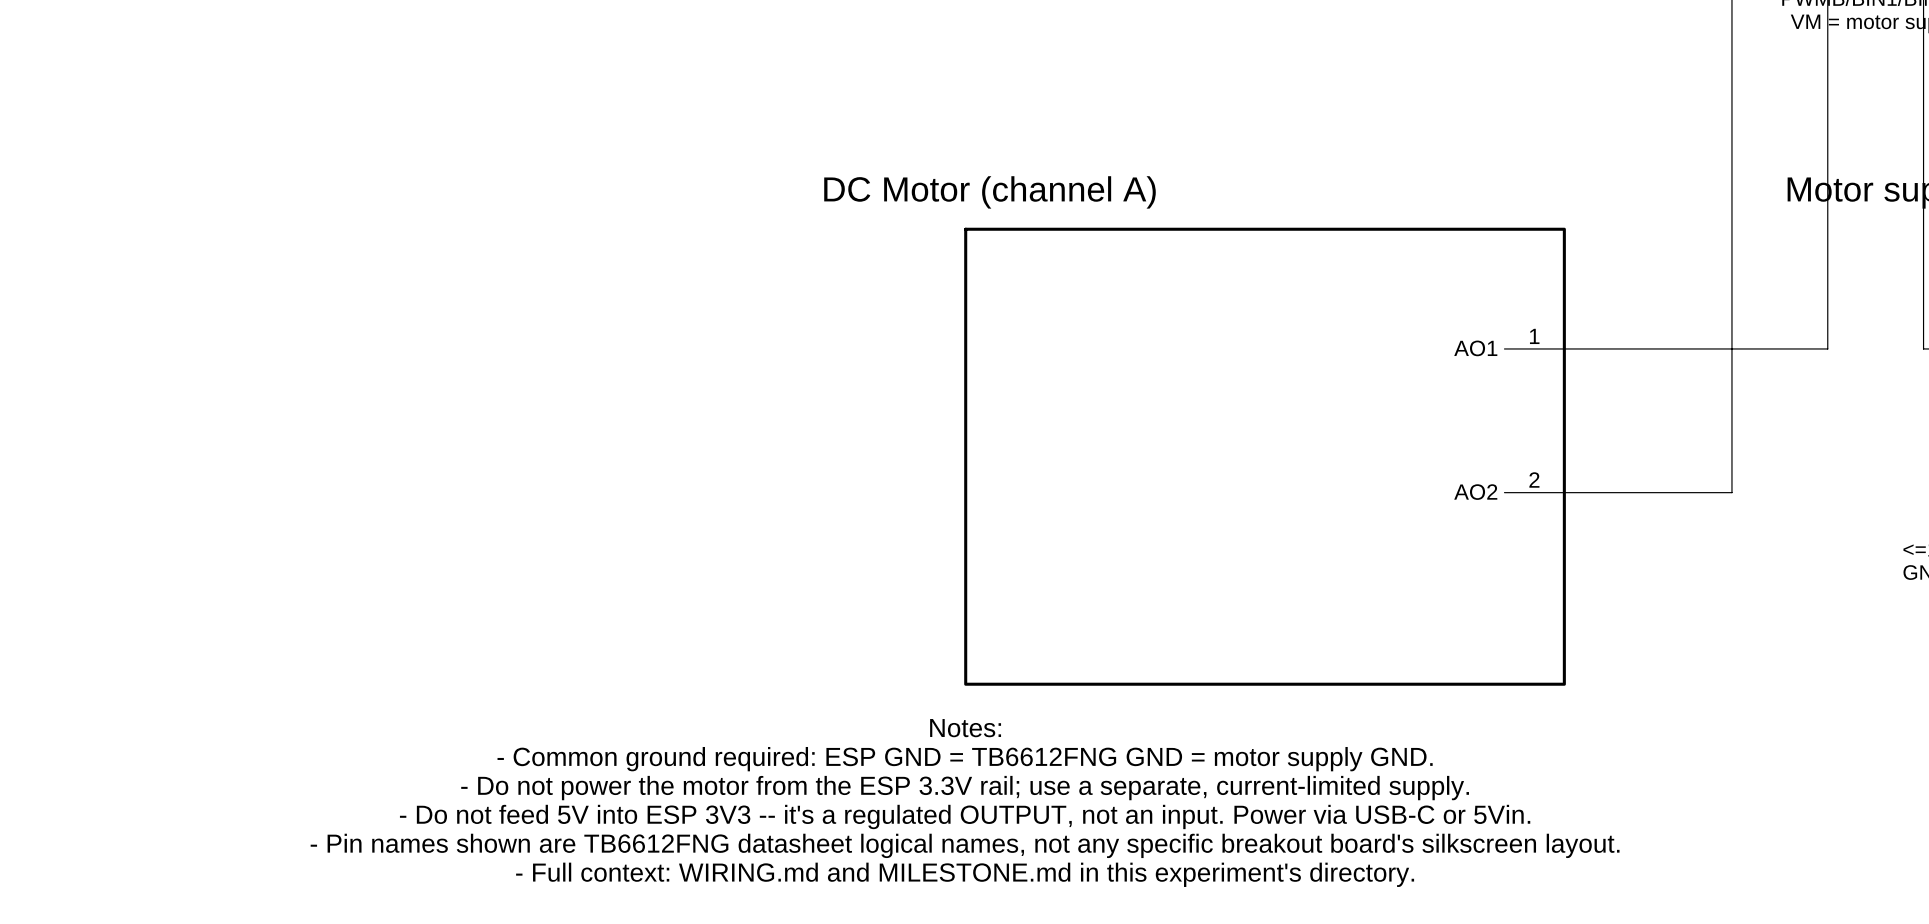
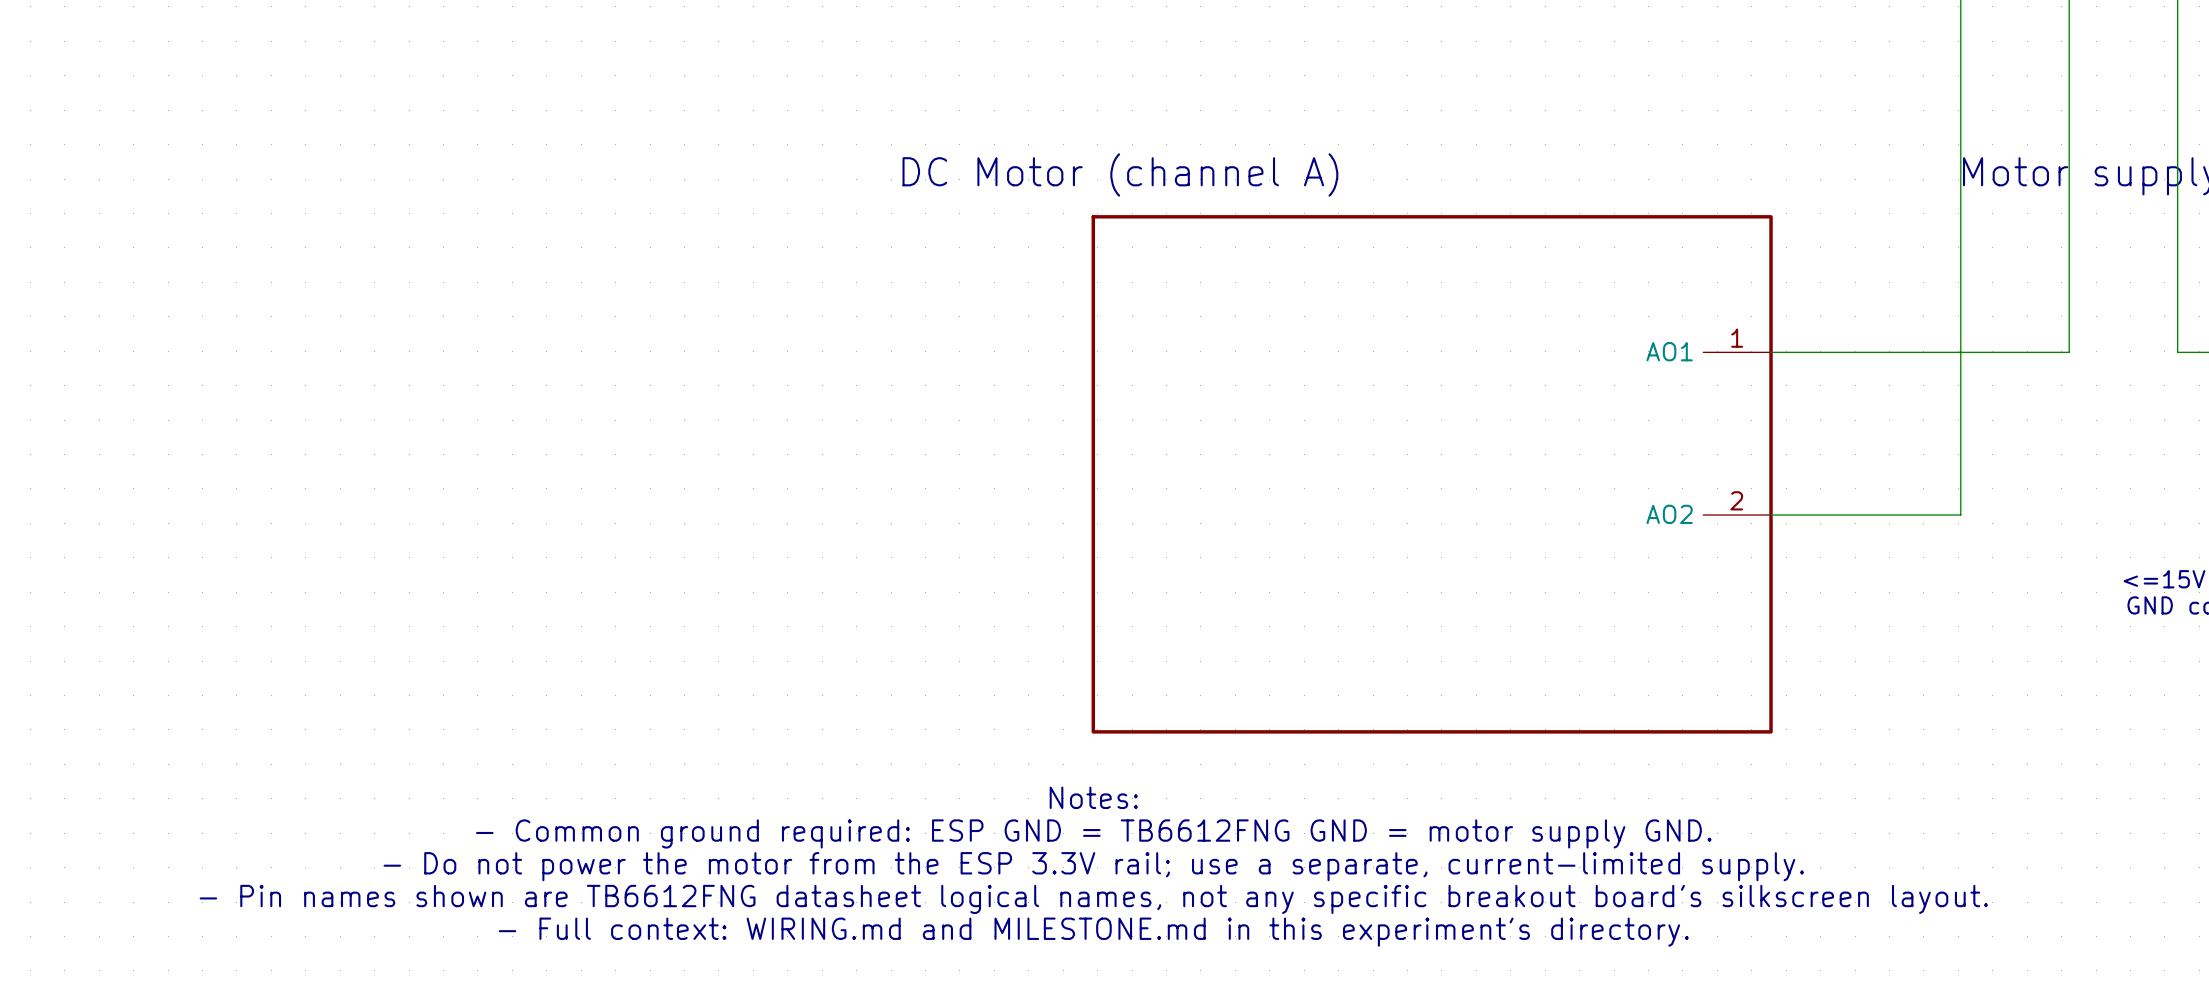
text position: Notes: (965, 728) -> Notes: (1093, 797)
text position: - Common ground required: ESP GND = TB6612FNG GND = motor supply GND. (965, 759) -> - Common ground required: ESP GND = TB6612FNG GND = motor supply GND. (1093, 833)
text position: - Do not power the motor from the ESP 3.3V rail; use a separate, current-limited supply. (965, 788) -> - Do not power the motor from the ESP 3.3V rail; use a separate, current-limited supply. (1093, 866)
text: - Do not feed 5V into ESP 3V3 -- it's a regulated OUTPUT, not an input. Power via USB-C or 5Vin. (965, 816) -> none
text position: - Pin names shown are TB6612FNG datasheet logical names, not any specific breakout board's silkscreen layout. (965, 845) -> - Pin names shown are TB6612FNG datasheet logical names, not any specific breakout board's silkscreen layout. (1093, 899)
text position: - Full context: WIRING.md and MILESTONE.md in this experiment's directory. (965, 874) -> - Full context: WIRING.md and MILESTONE.md in this experiment's directory. (1093, 932)

